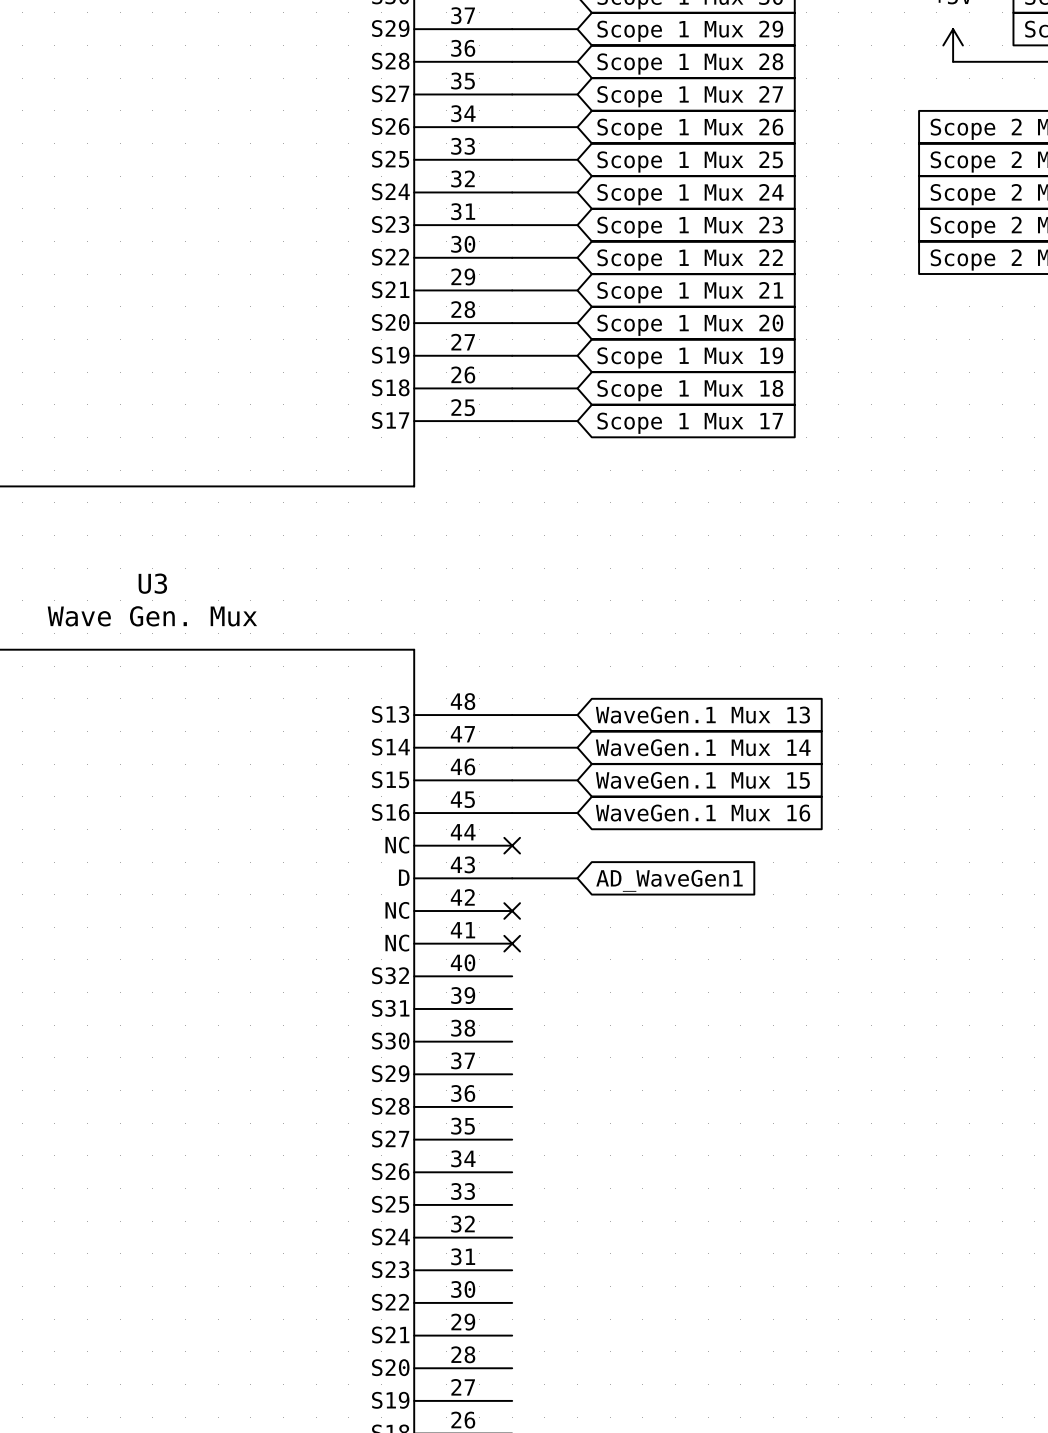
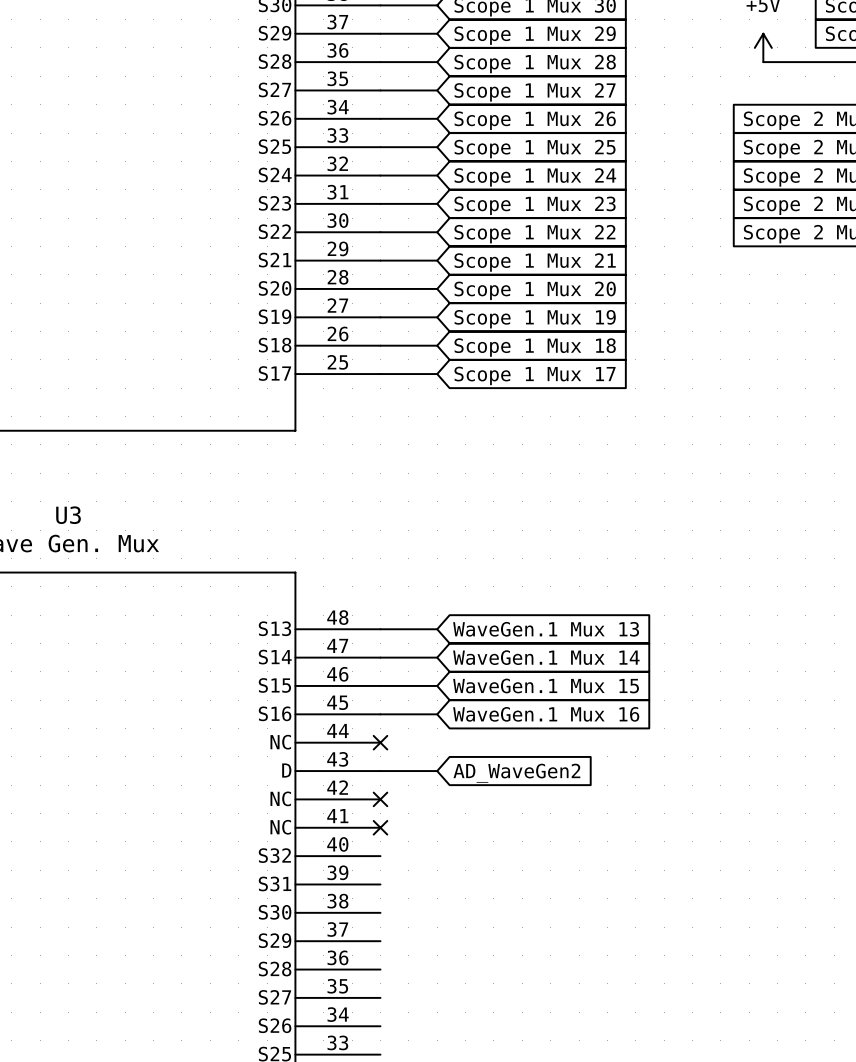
global label: AD_WaveGen1 (669, 880) -> AD_WaveGen2 (516, 773)

